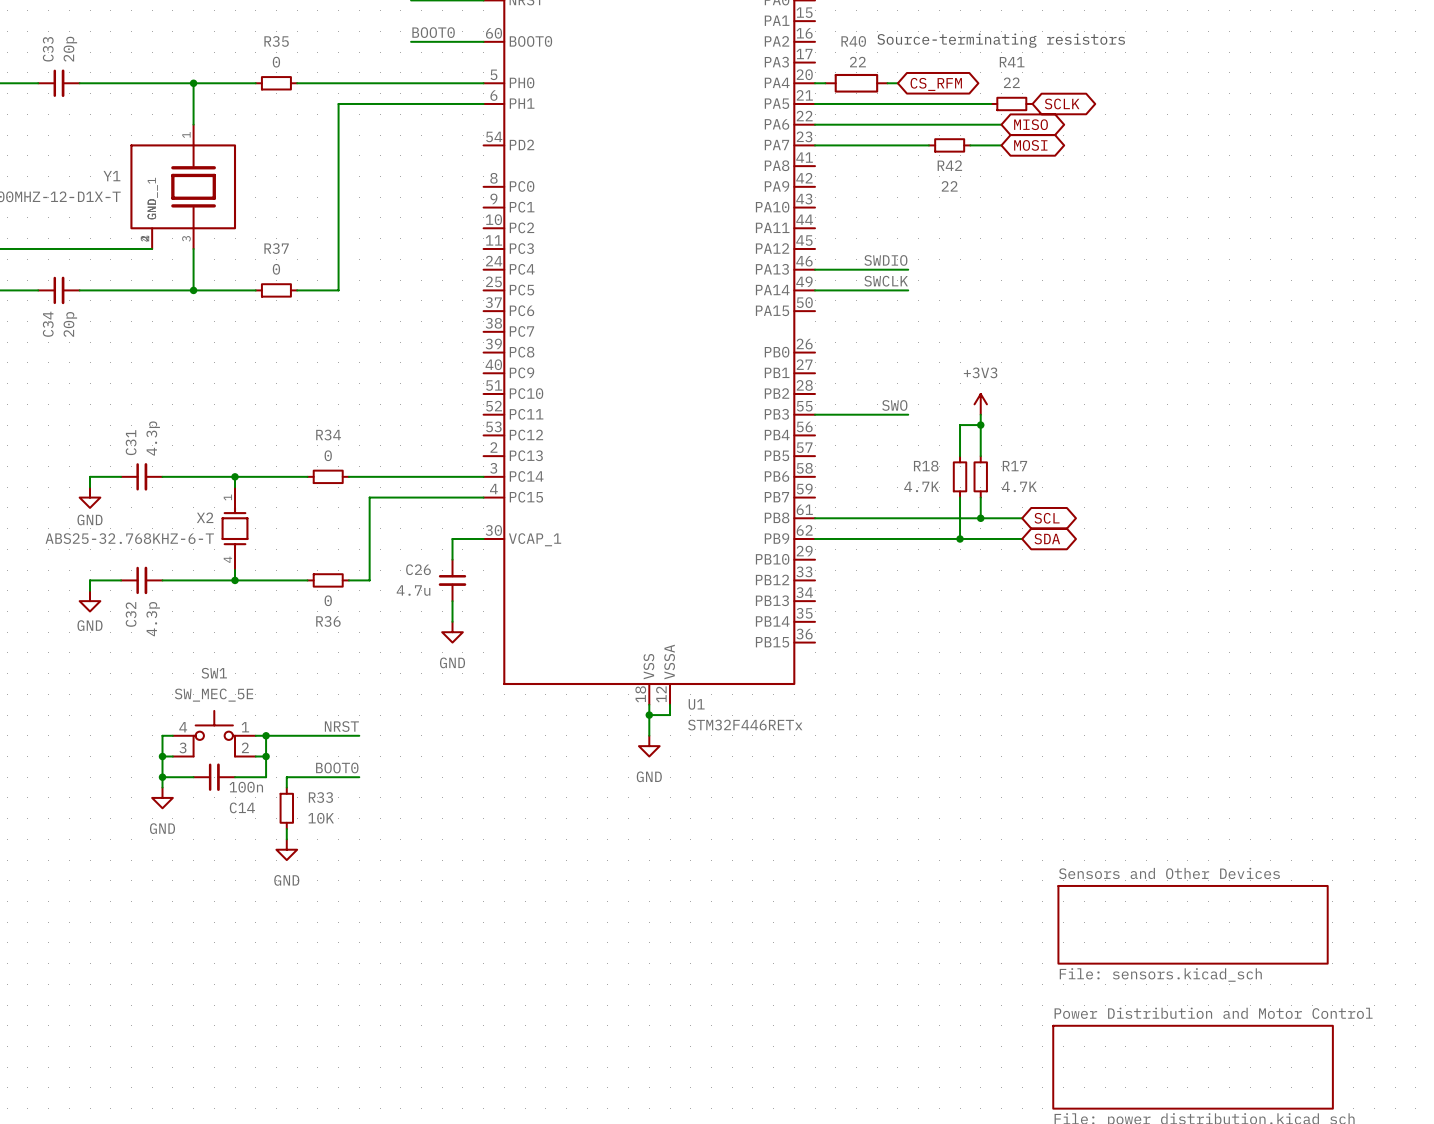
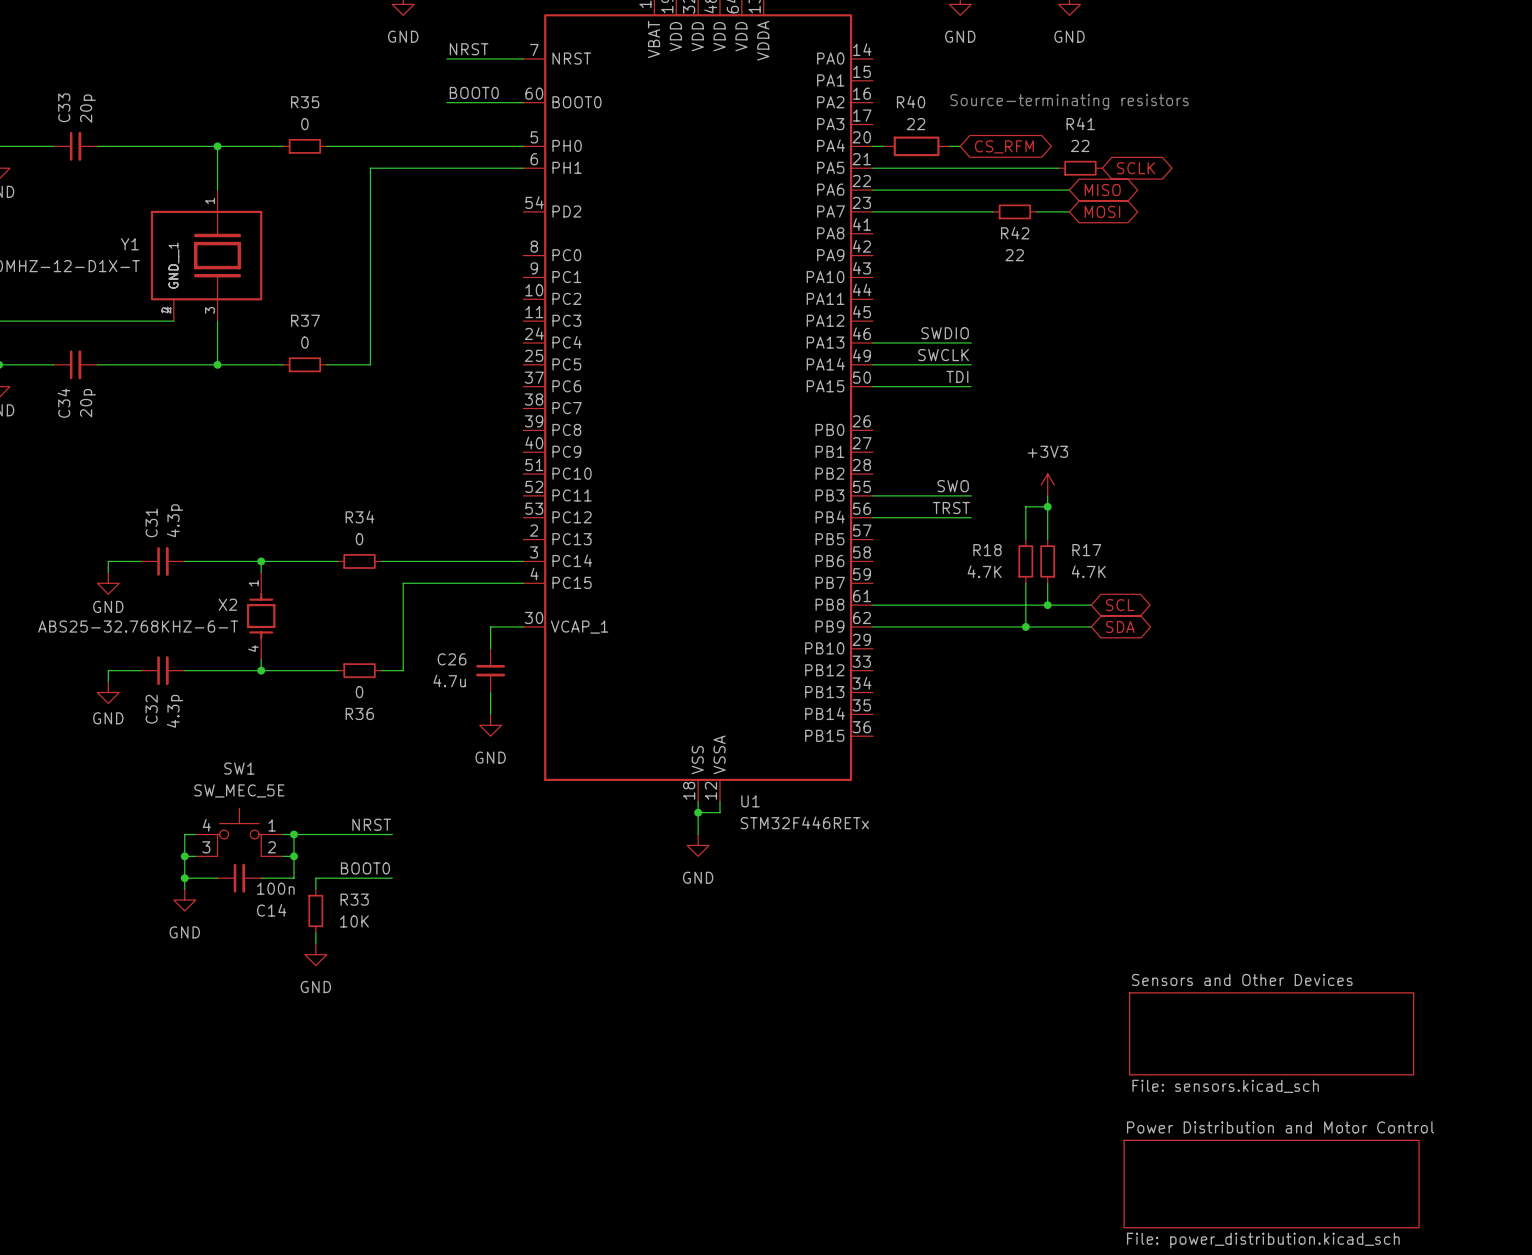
label: none -> TDI (957, 376)
wire: none -> (872, 386) (971, 386)
label: none -> TRST (951, 508)
wire: none -> (872, 517) (971, 517)

